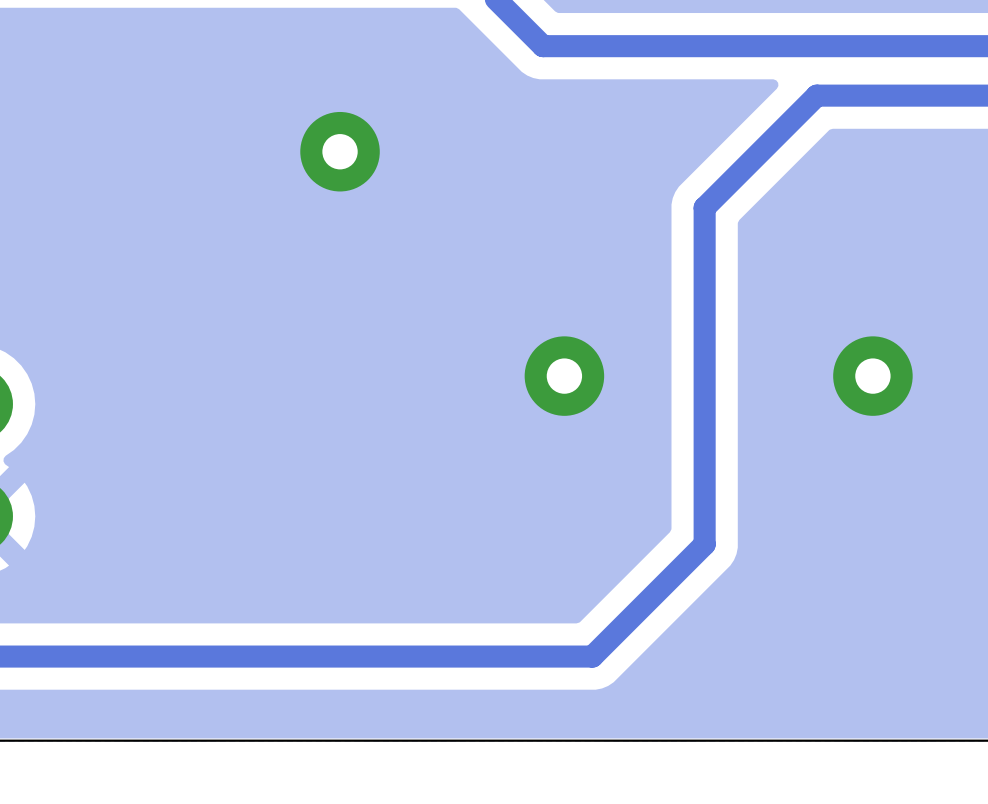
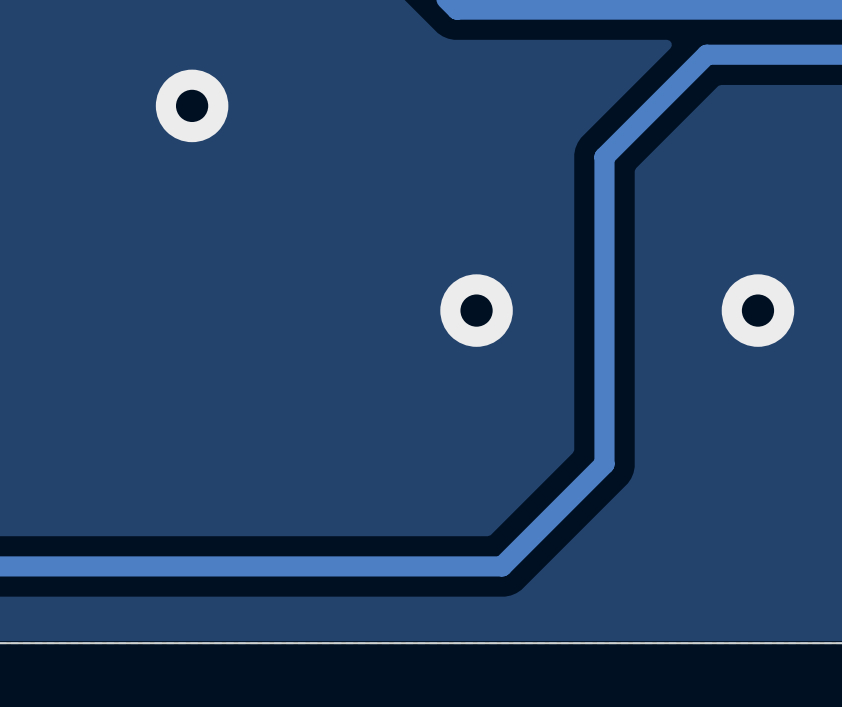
via position: (340, 151) -> (192, 105)

